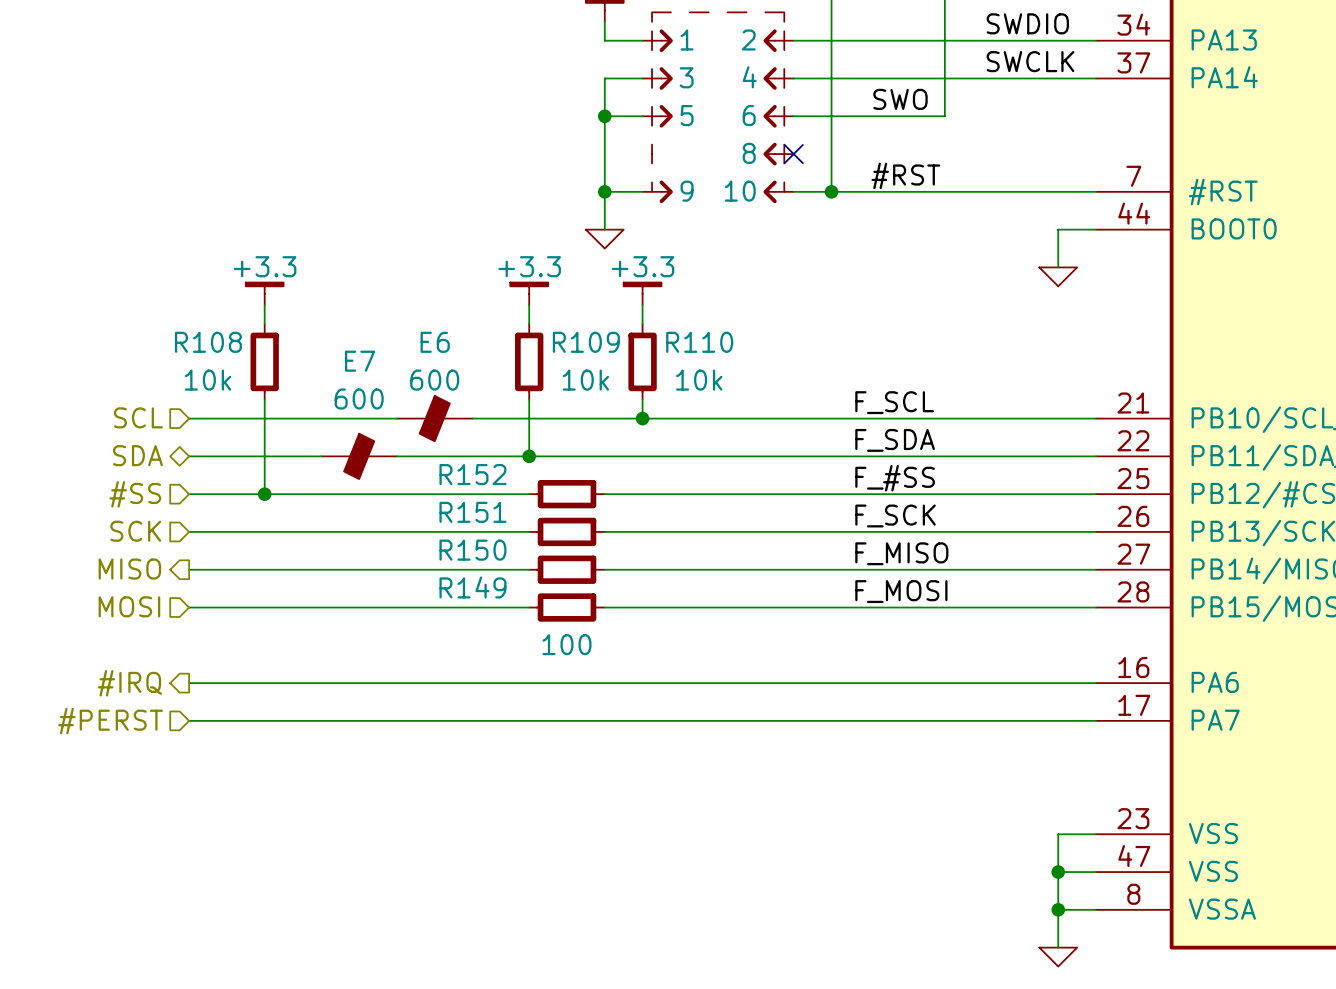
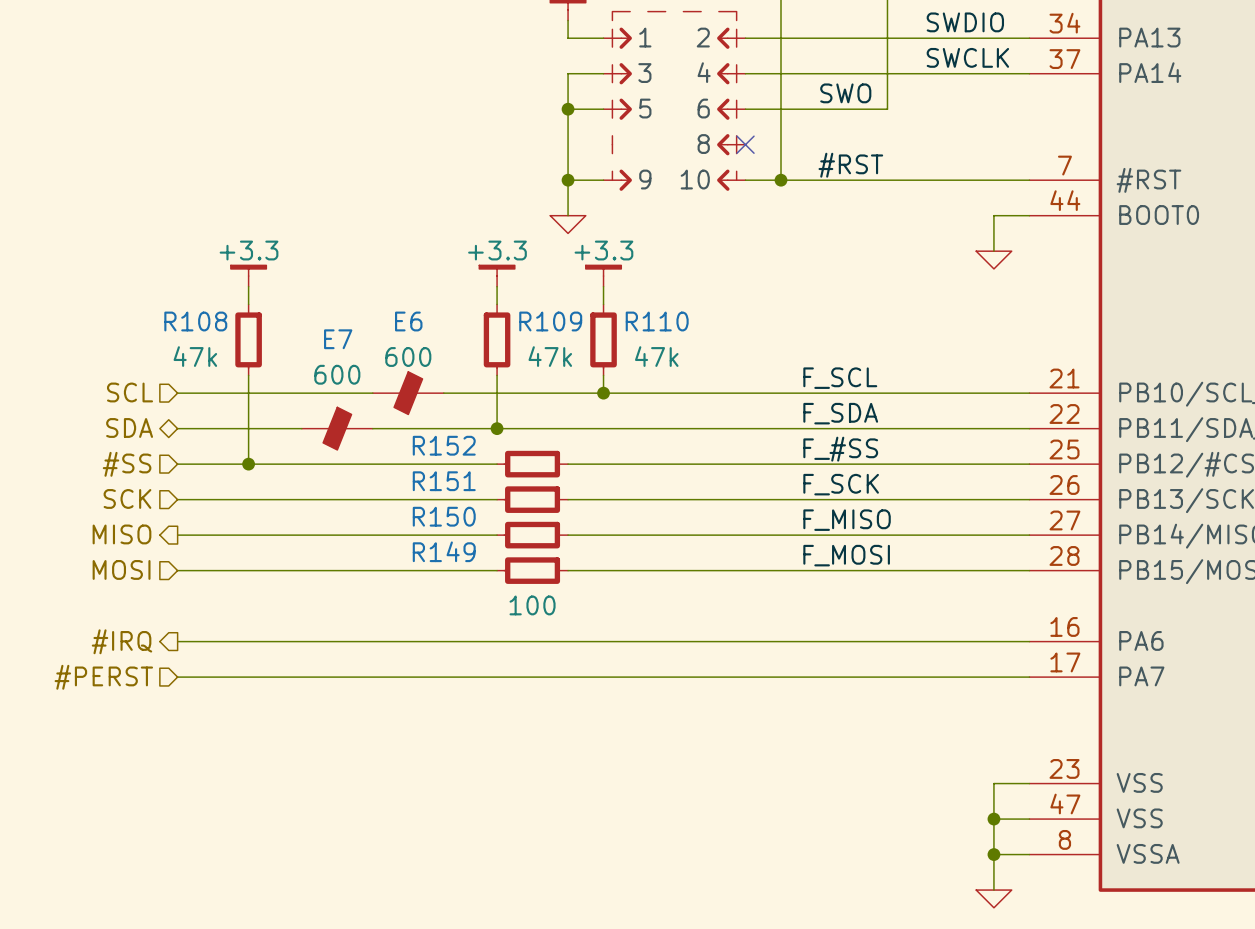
R108 value: 10k (208, 380) -> 47k (195, 356)
R109 value: 10k (585, 380) -> 47k (550, 356)
R110 value: 10k (699, 380) -> 47k (656, 356)

